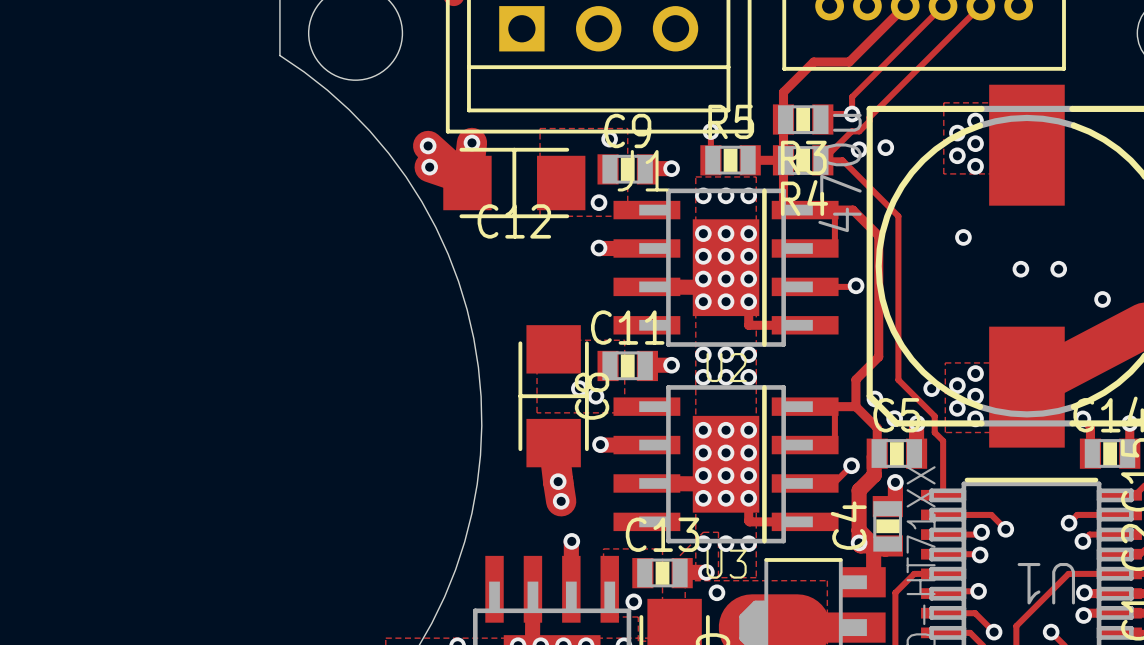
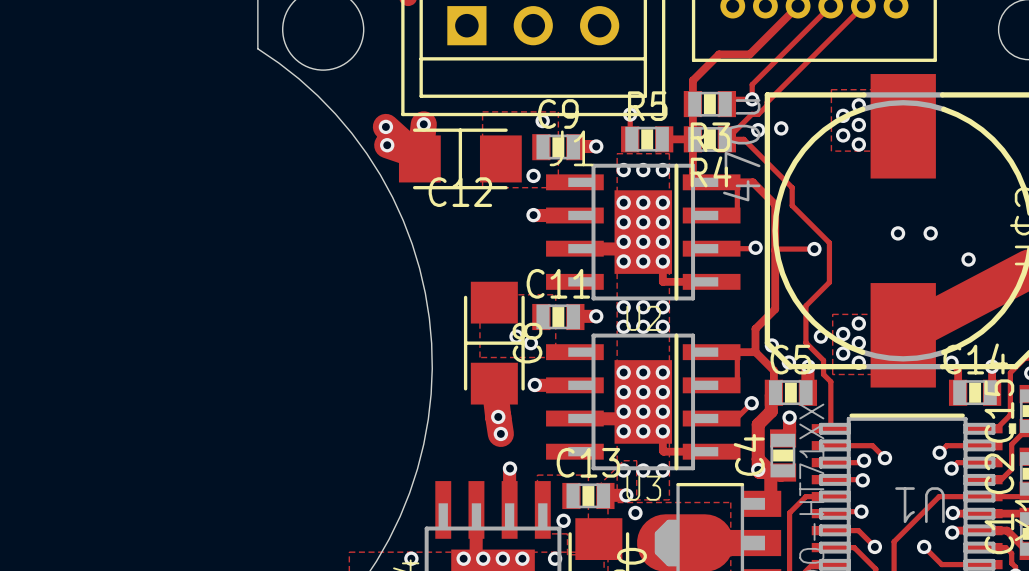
track: (898, 237) (898, 379) (914, 395) -> (792, 205) (829, 242) (829, 282) (805, 305) (805, 342)
via position: (963, 237) -> (814, 249)
track: none -> (814, 249) (775, 250)

